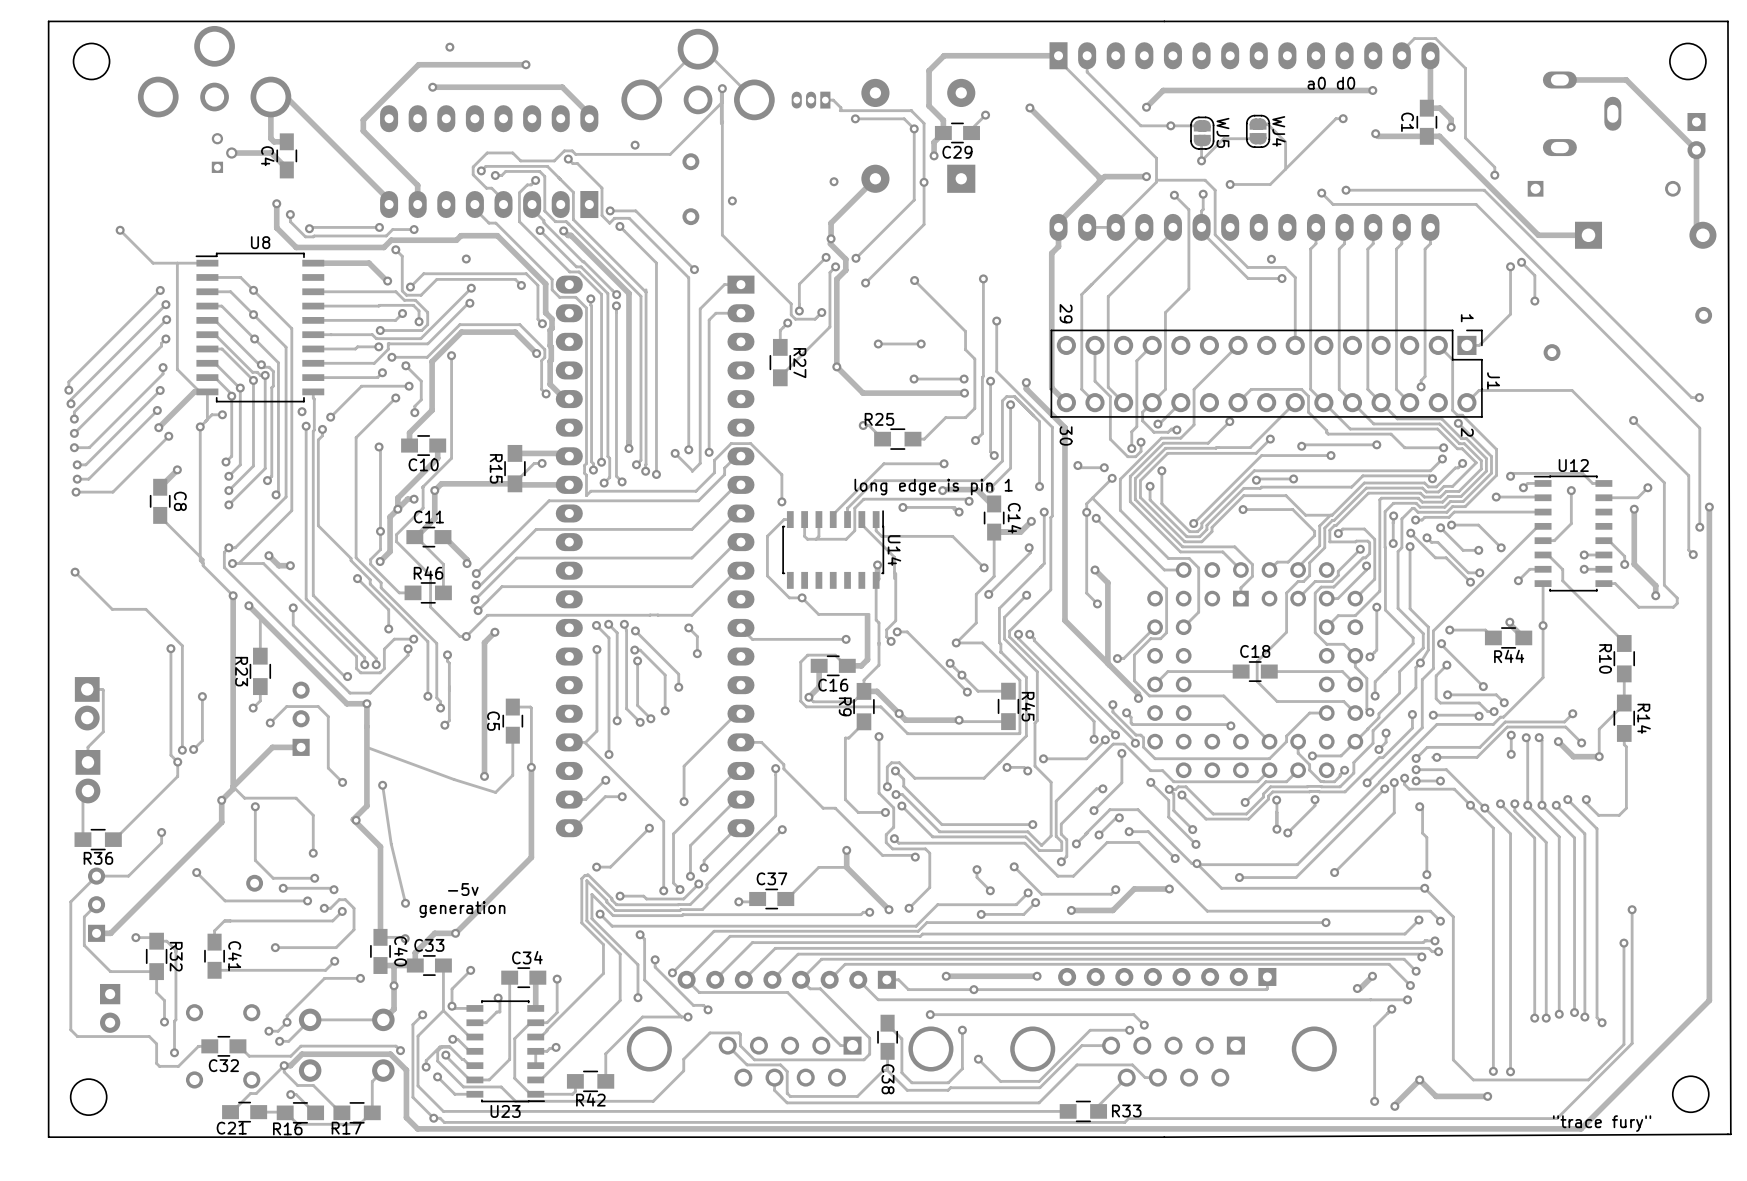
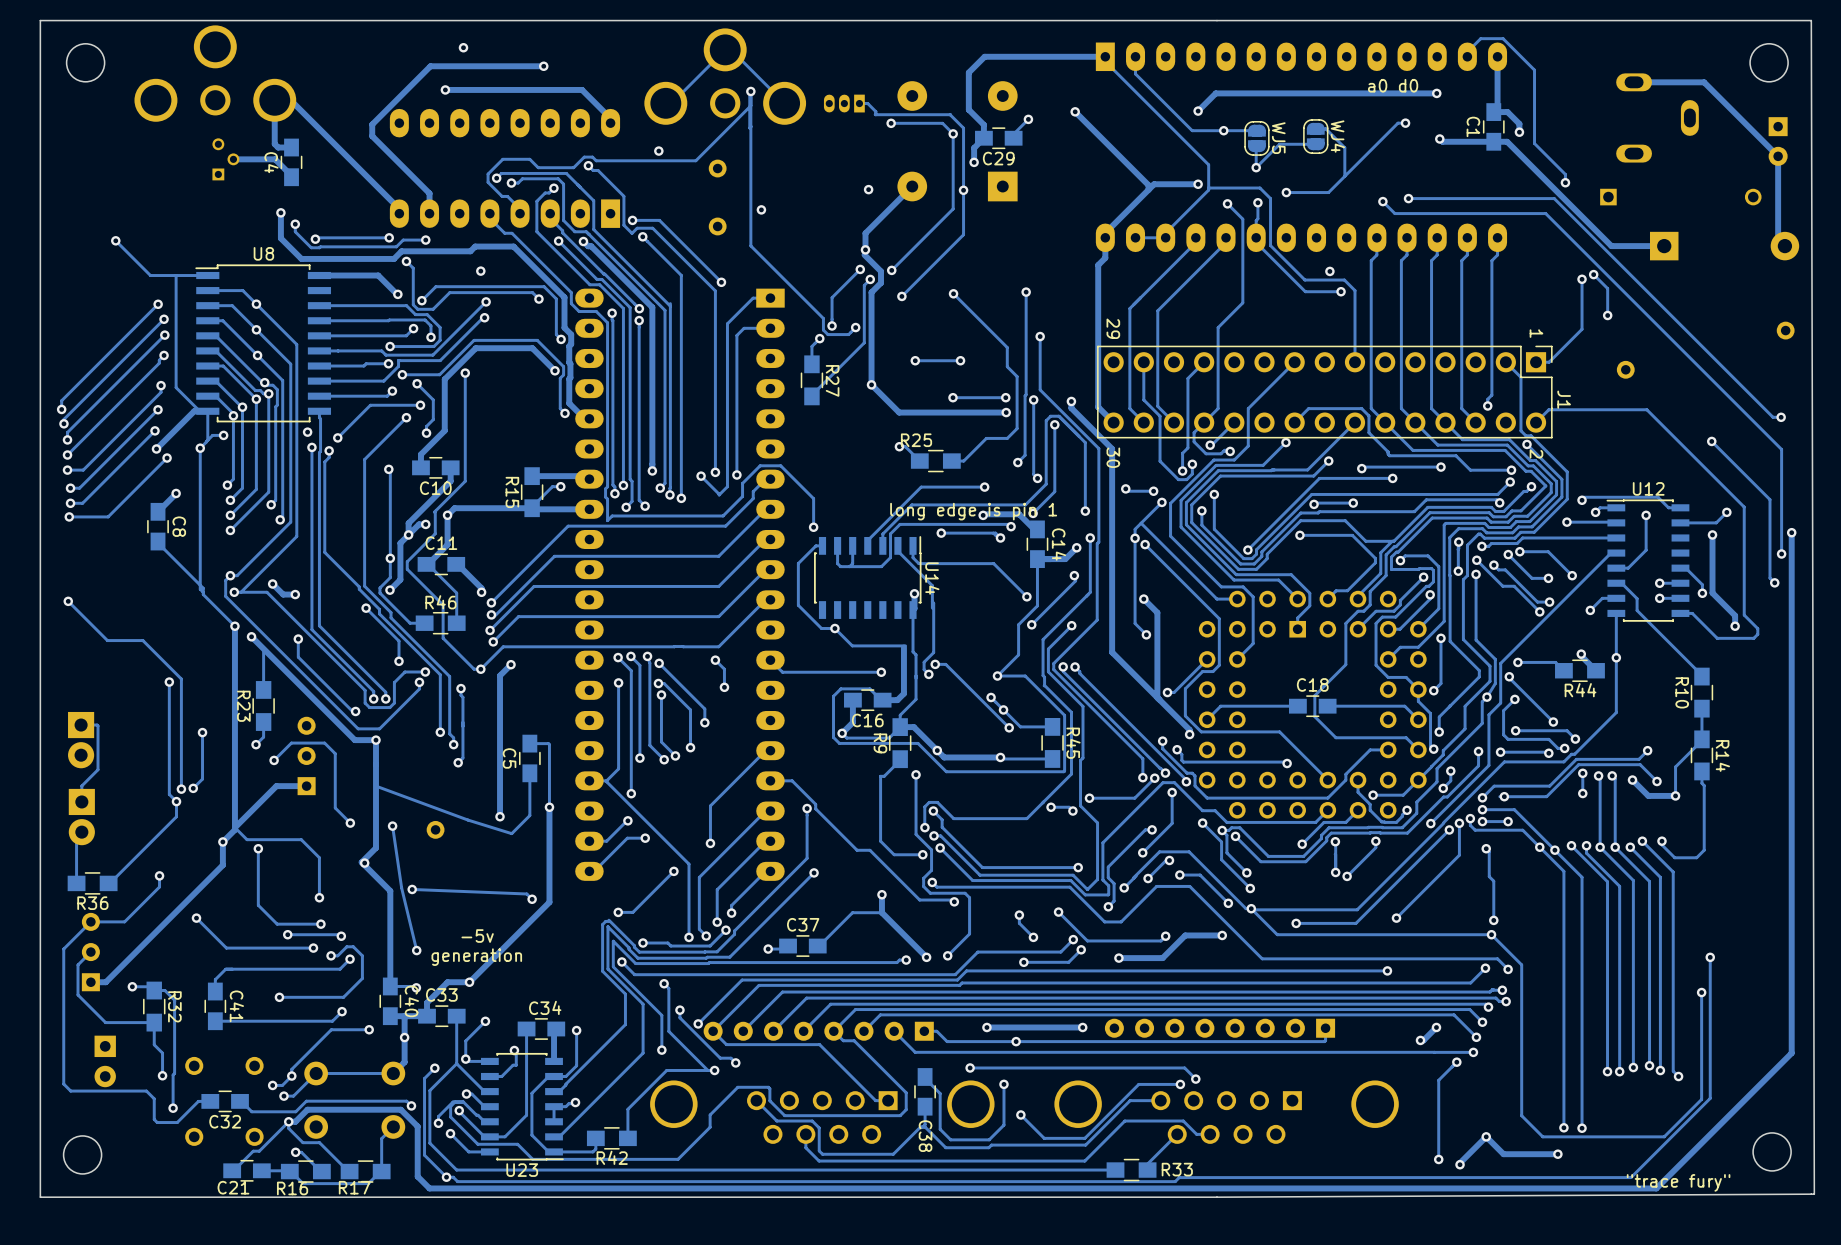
track: none -> (412, 889) (526, 893) (532, 899)
via: none -> (412, 889)
via: none -> (532, 899)
part position: (254, 883) -> (435, 829)

